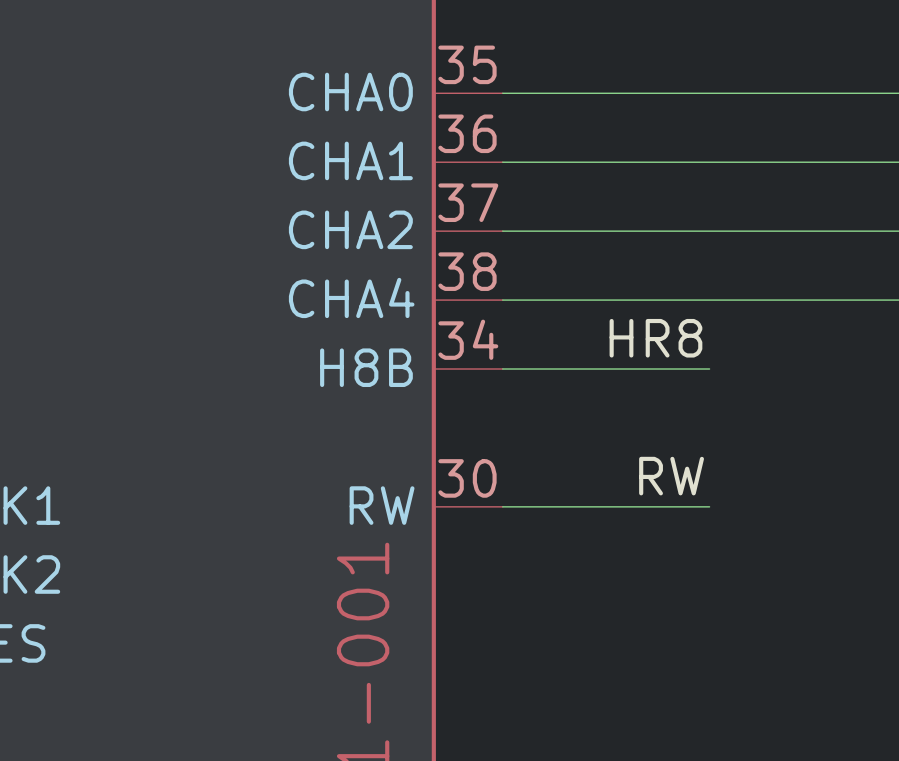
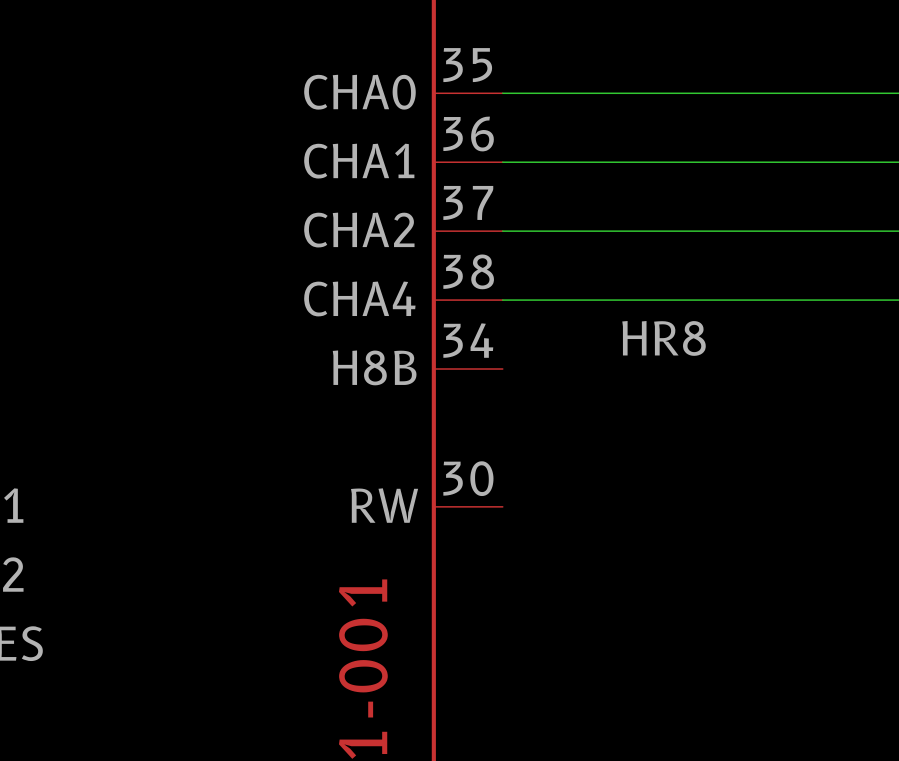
wire: (502, 369) (709, 369) -> none
label: RW (671, 476) -> none
wire: (502, 506) (709, 506) -> none

